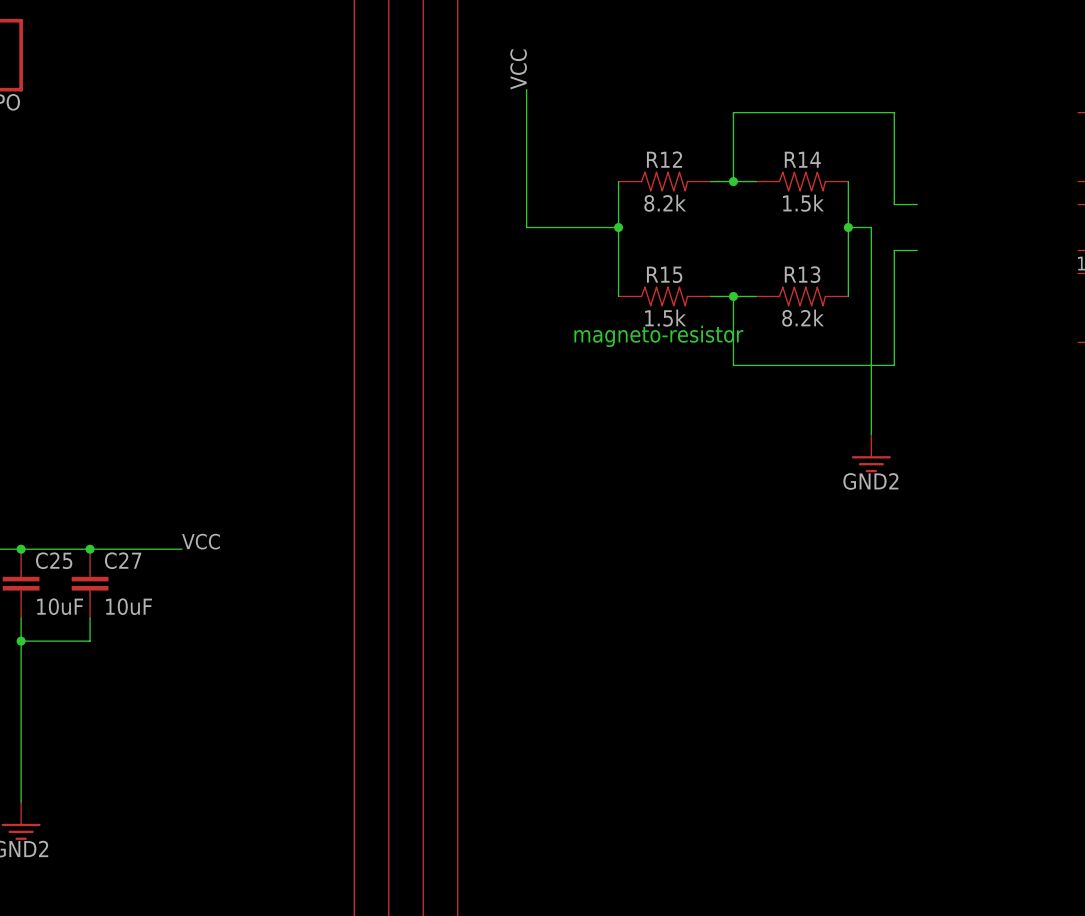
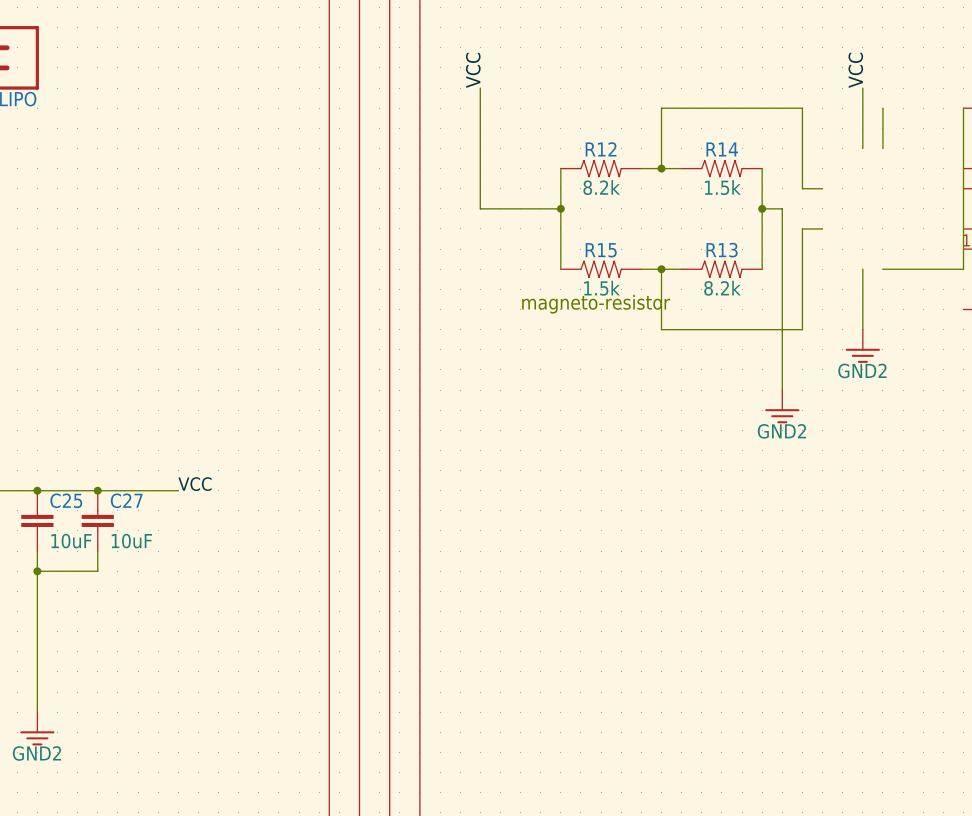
label: none -> VCC (855, 70)
wire: none -> (862, 88) (862, 148)
wire: none -> (882, 108) (882, 148)
wire: none -> (963, 108) (963, 269) (882, 269)
wire: none -> (862, 269) (862, 329)
power symbol: none -> GND2 (862, 346)

